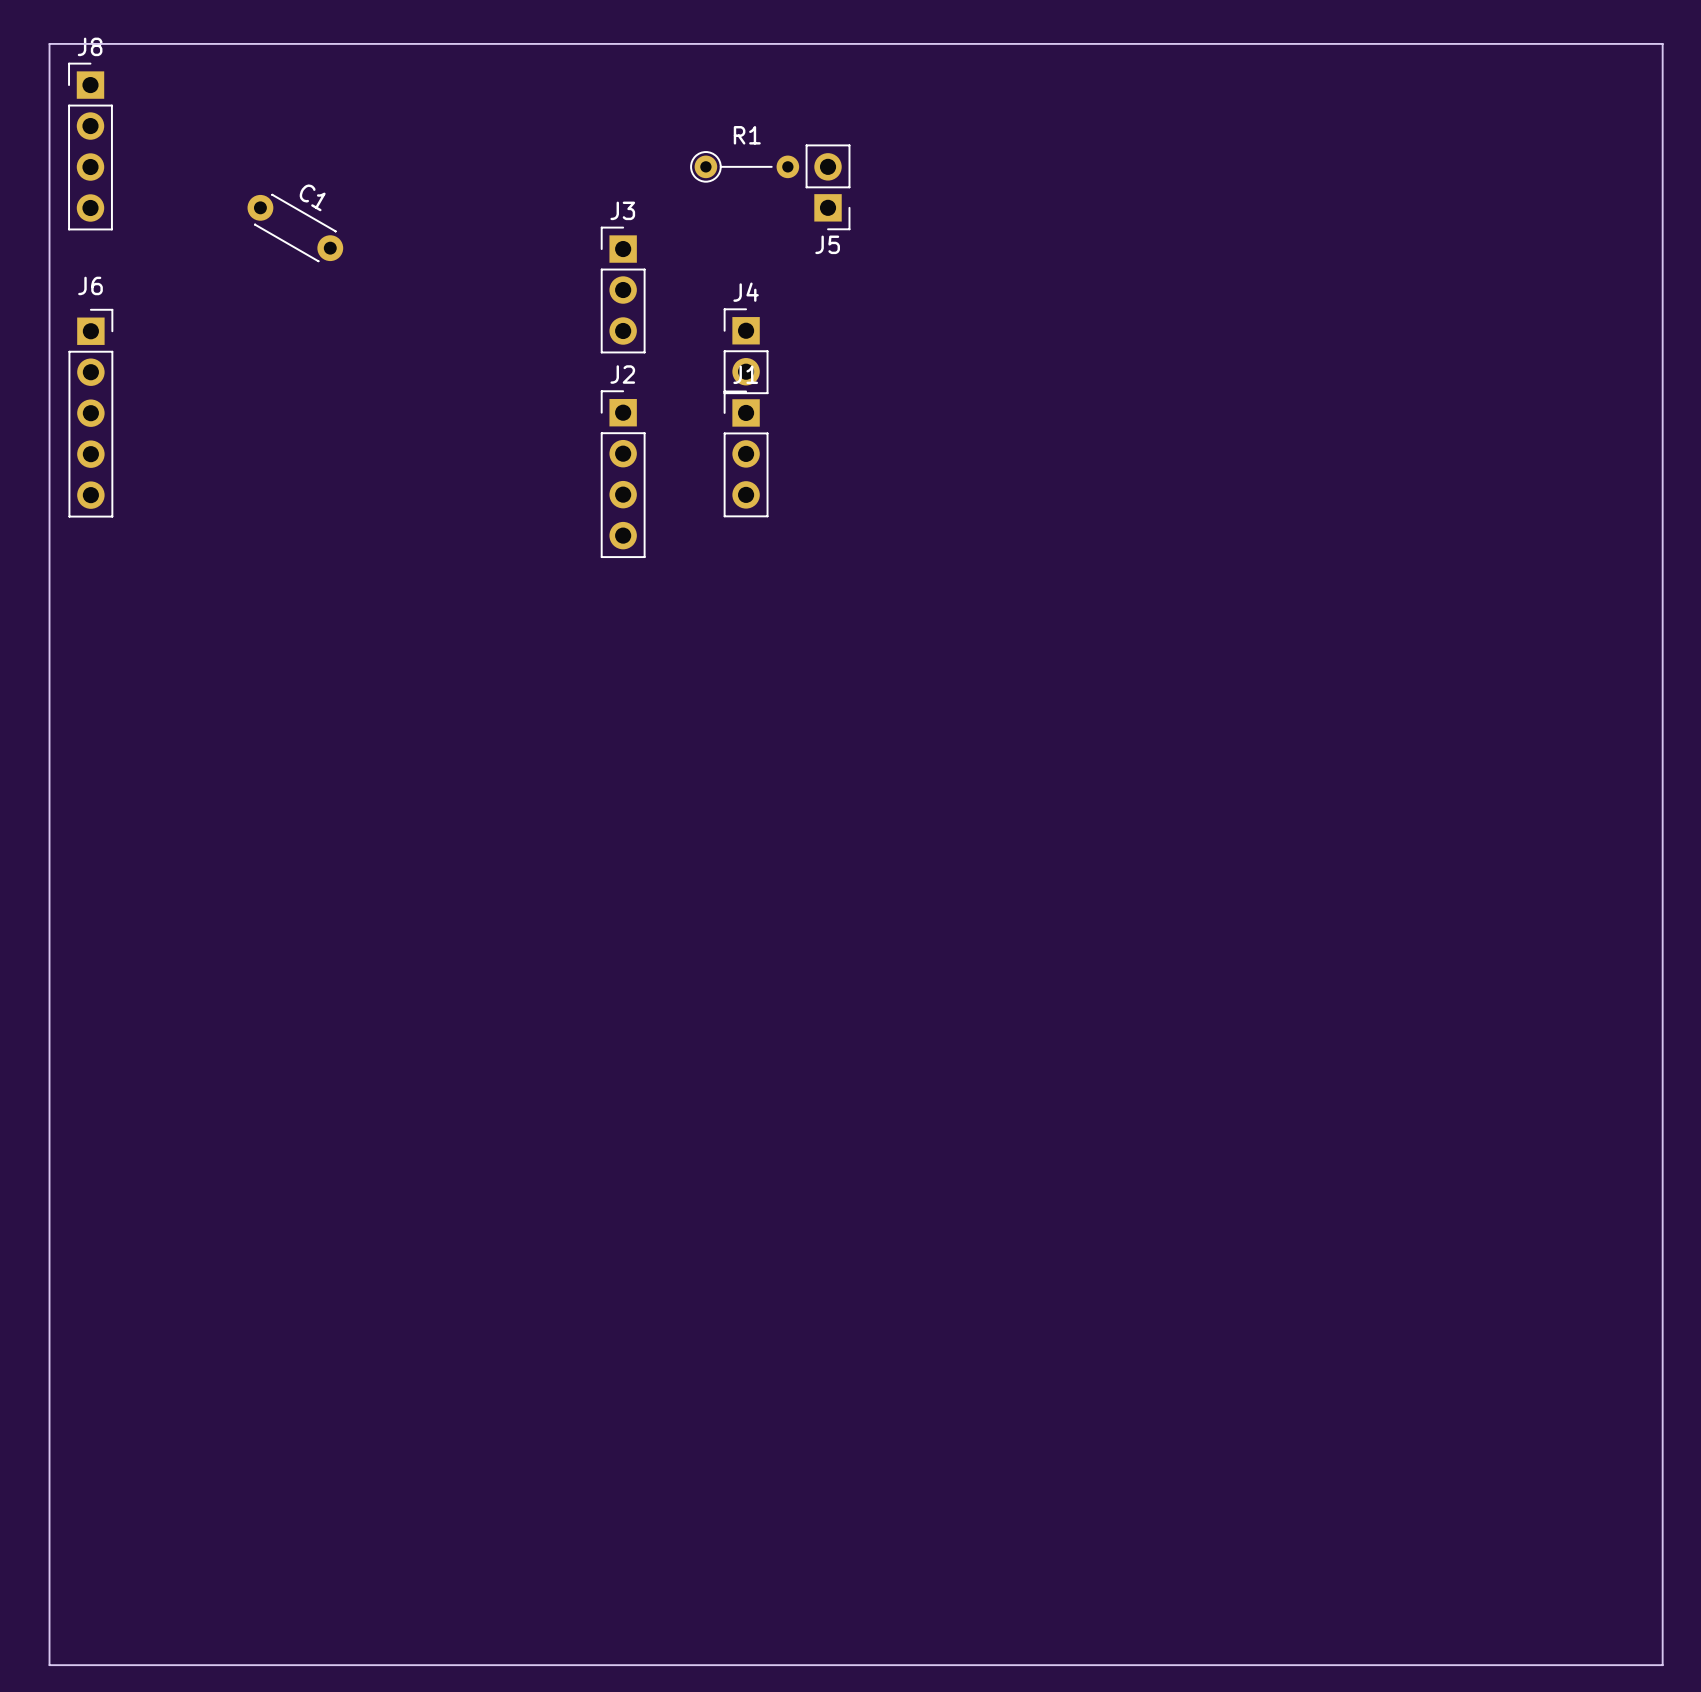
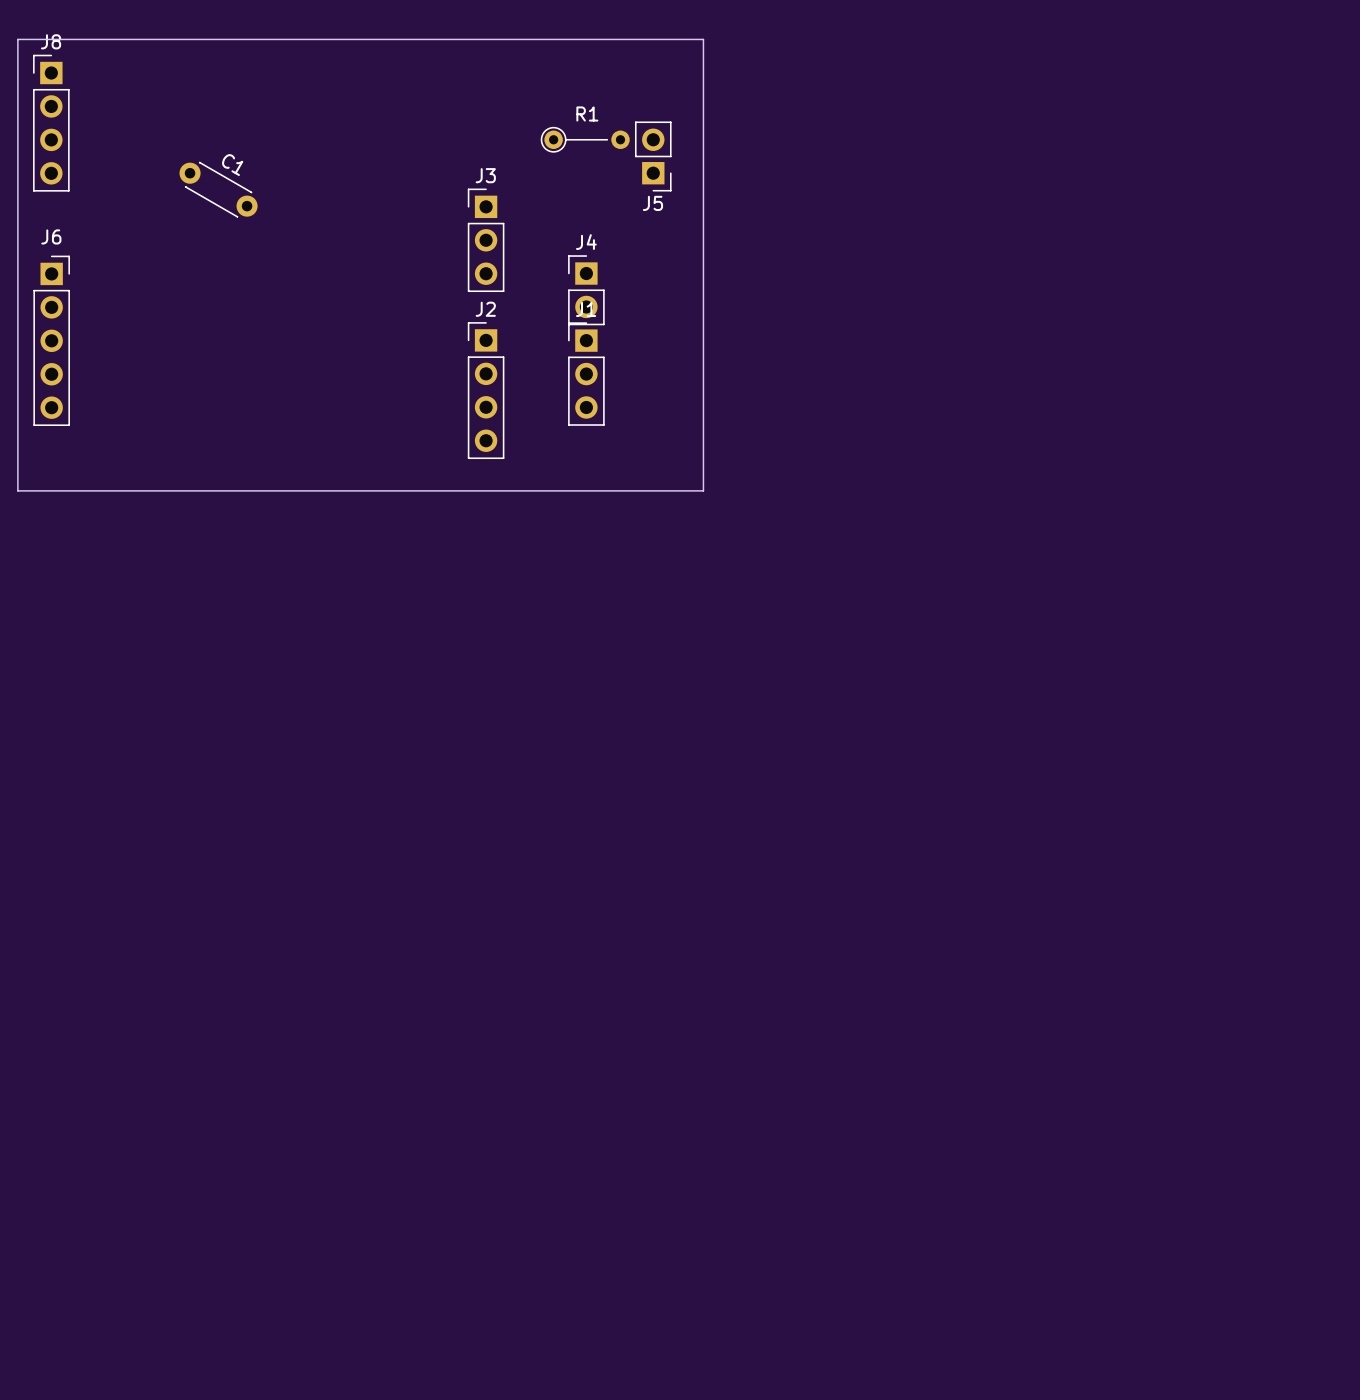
board edge: (889, 43) (1662, 43) (1662, 1665) (49, 1665) (49, 597) -> (703, 39) (703, 490) (17, 490)

